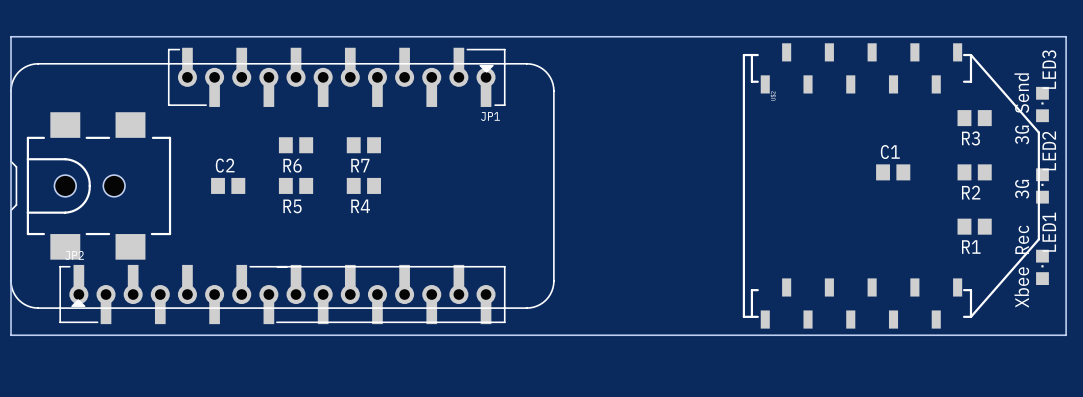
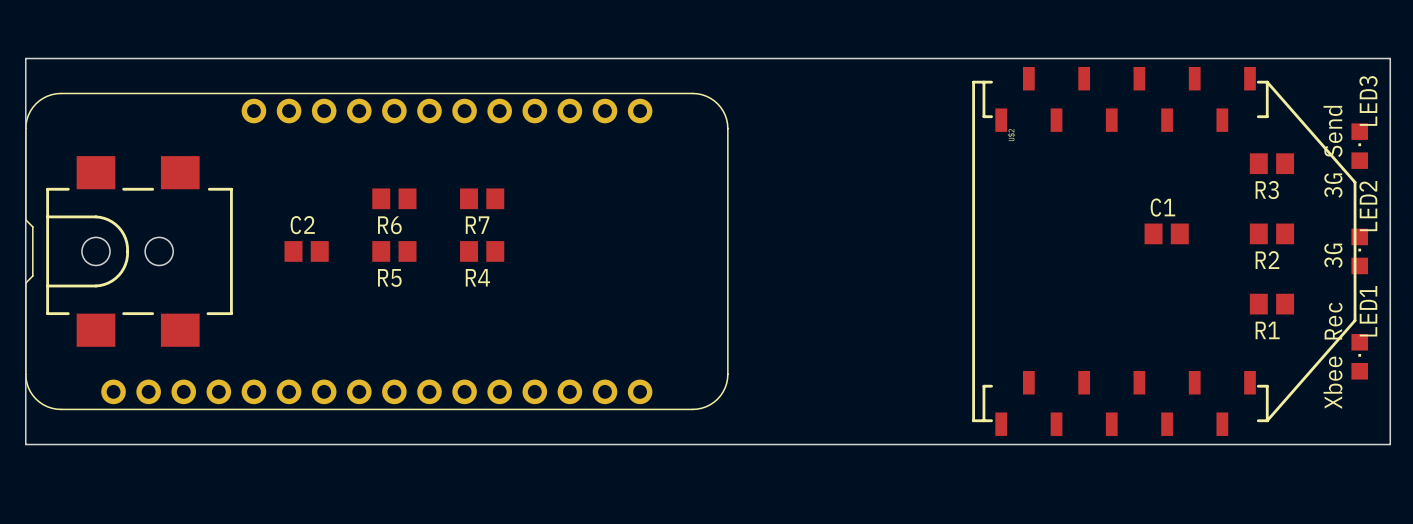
JP1: (336, 77) -> none
part: (282, 294) -> none

